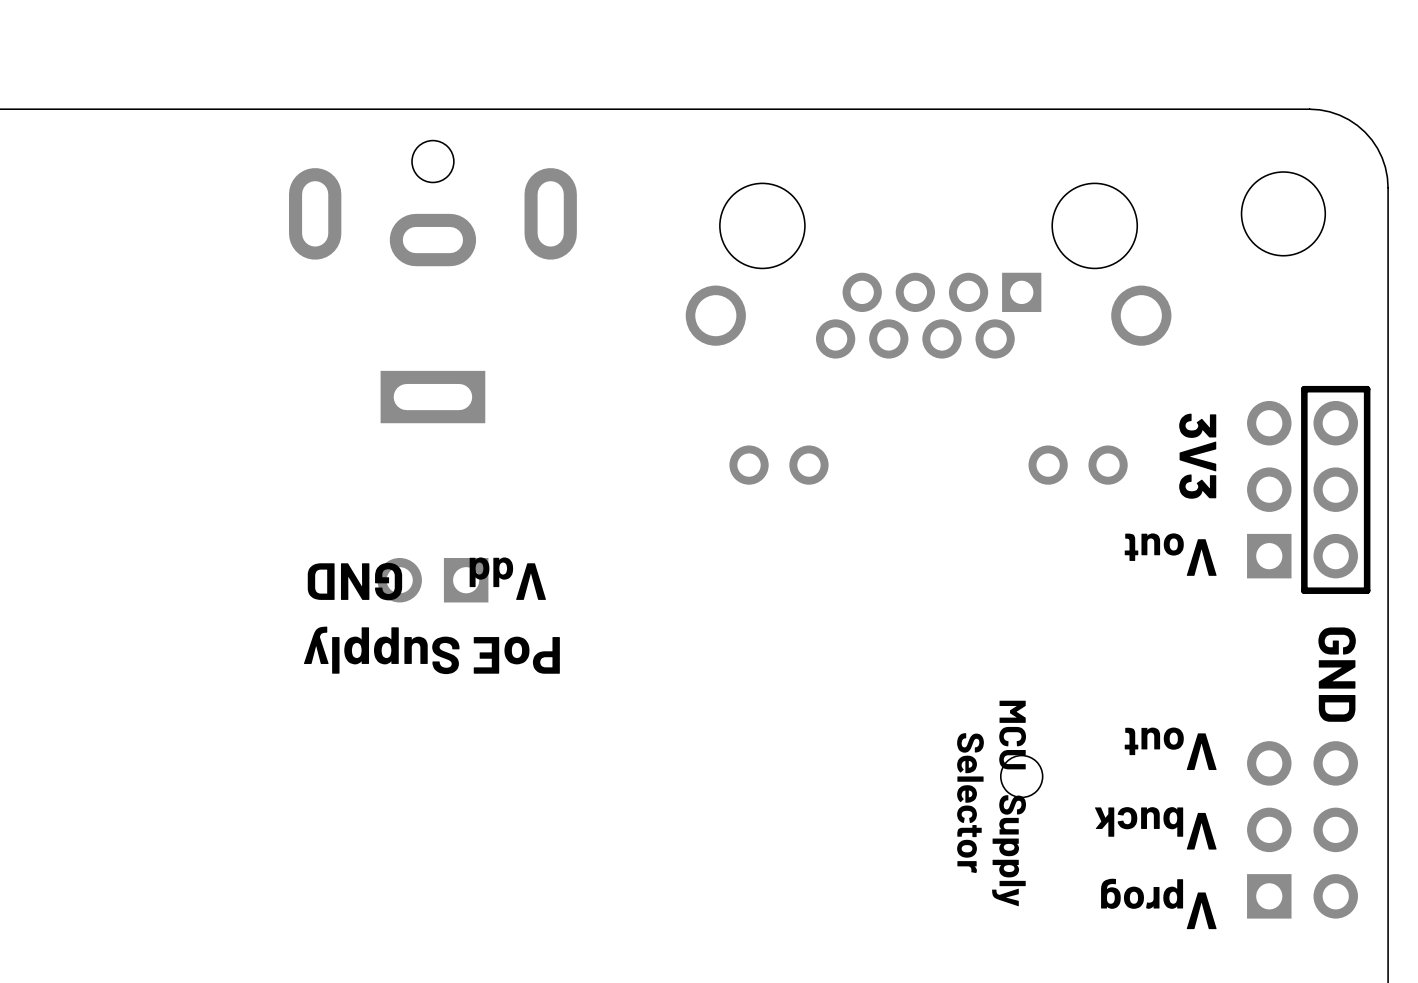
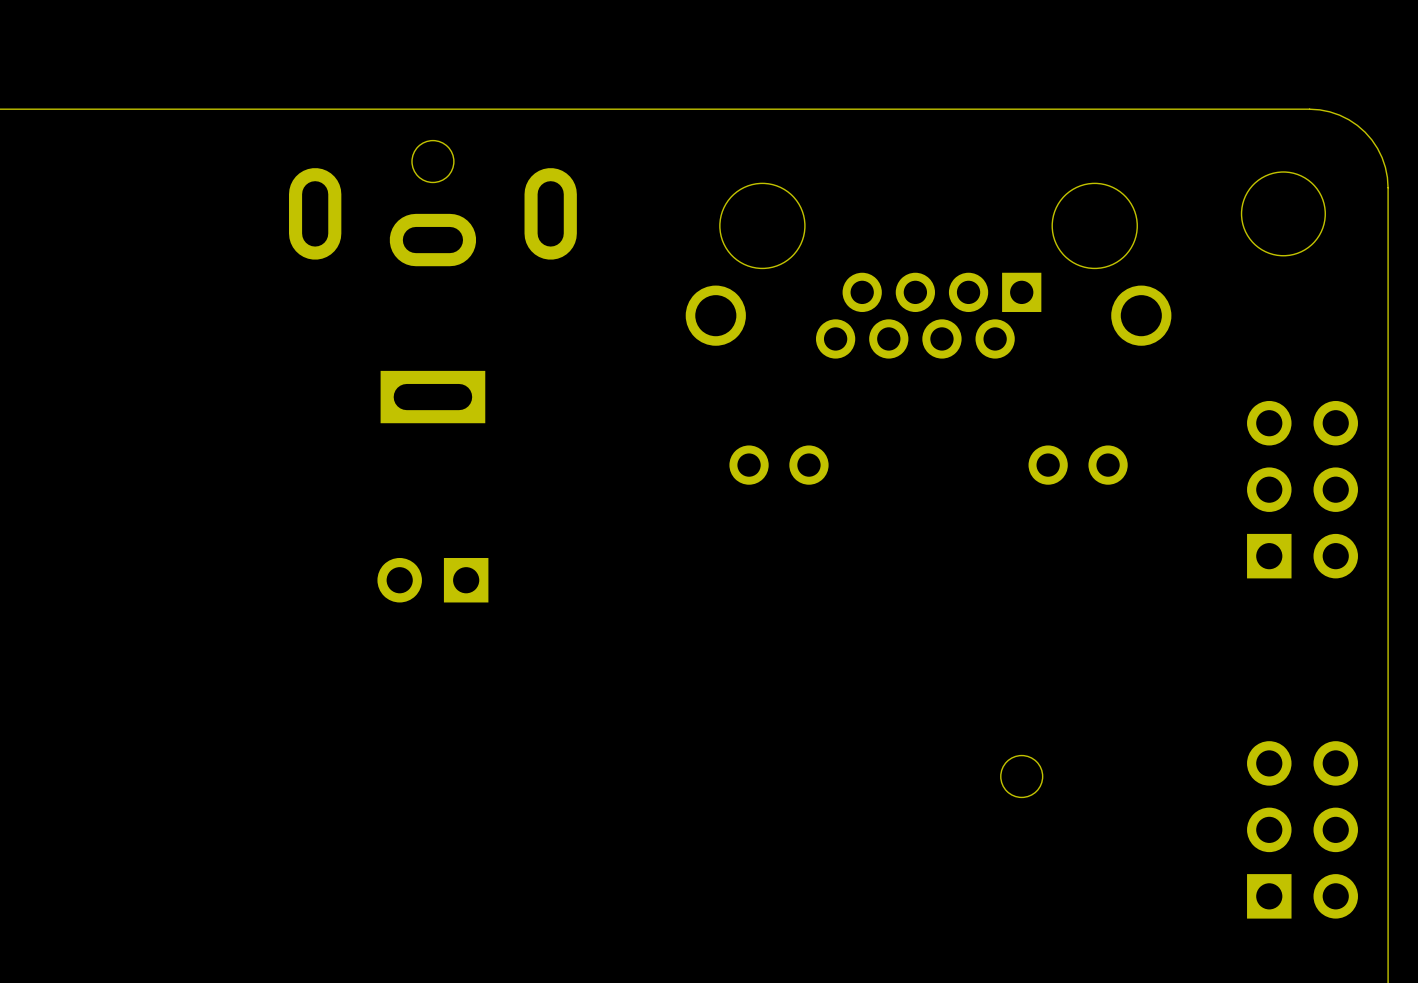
line: (1367, 389) (1304, 389) (1304, 590) (1367, 590) (1367, 389) -> none
text: 3V3 (1197, 456) -> none
text: Vout (1170, 554) -> none
text: Vdd GND (426, 578) -> none
text: PoE Supply (431, 650) -> none
text: GND (1337, 674) -> none
text: Vout (1170, 748) -> none
text: Selector (970, 803) -> none
text: MCU Supply (1009, 803) -> none
text: Vbuck (1155, 828) -> none
text: Vprog (1158, 903) -> none

